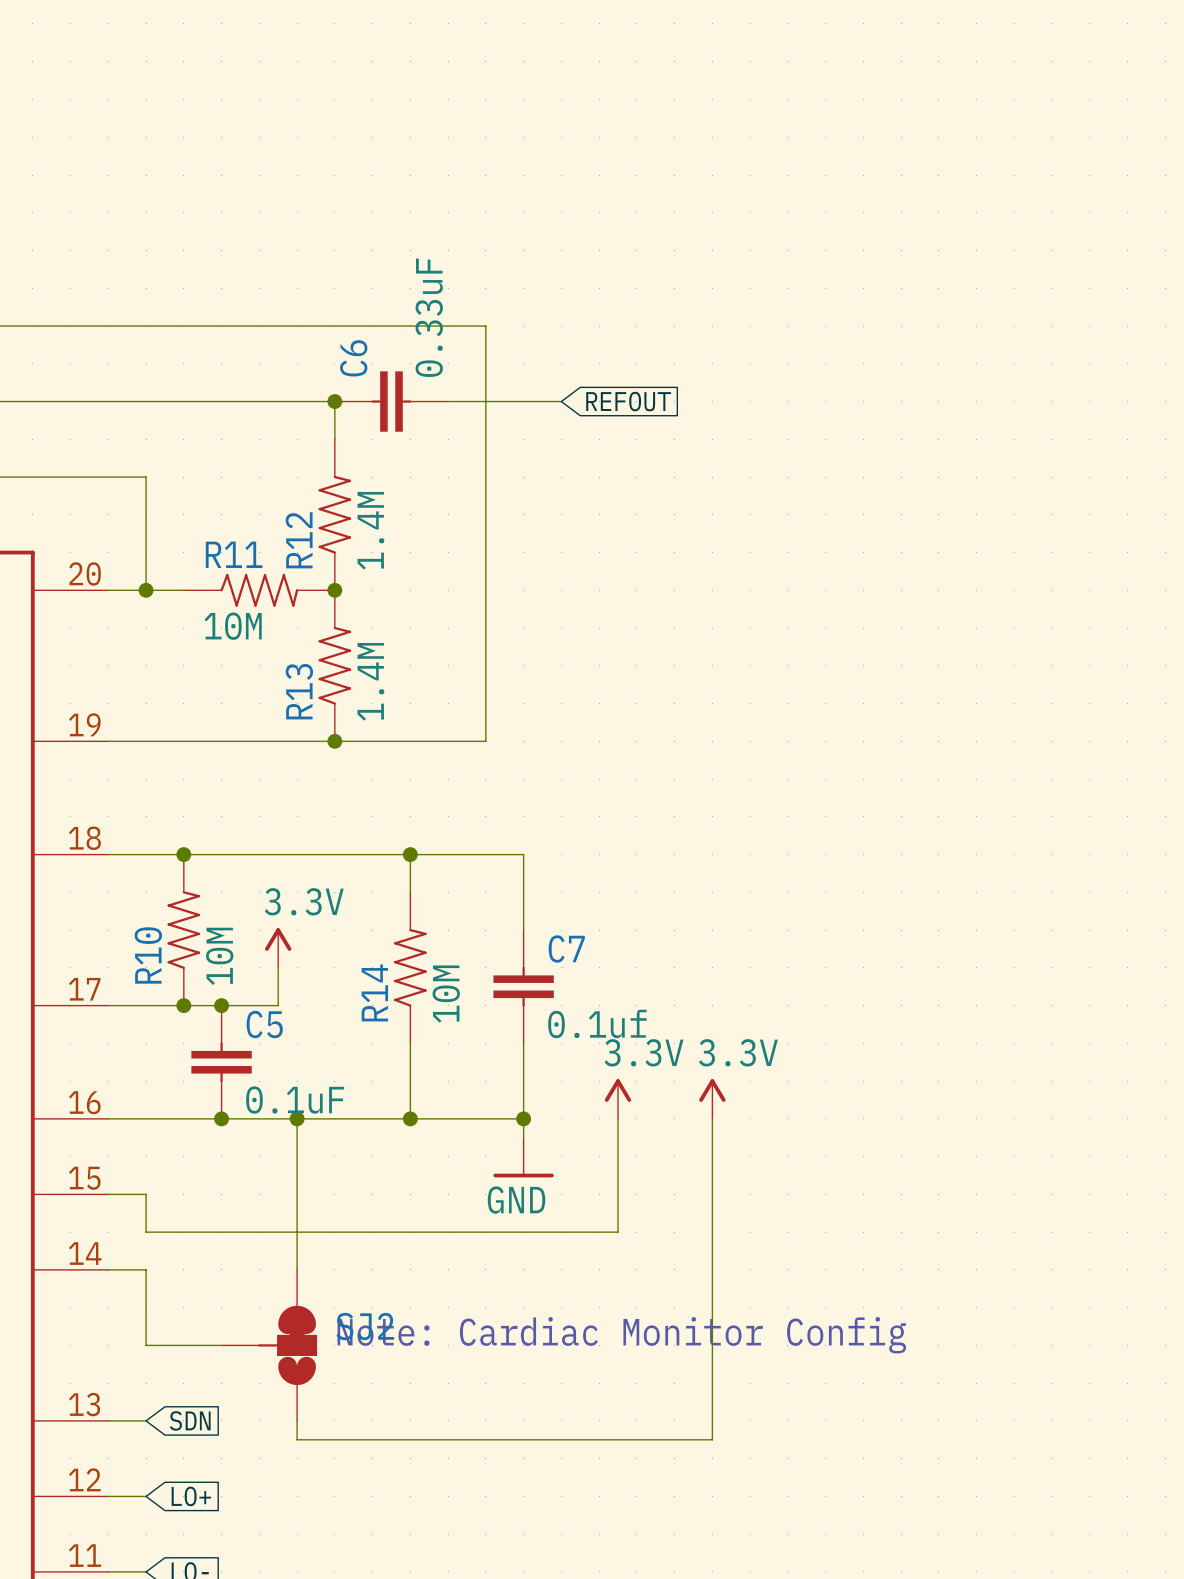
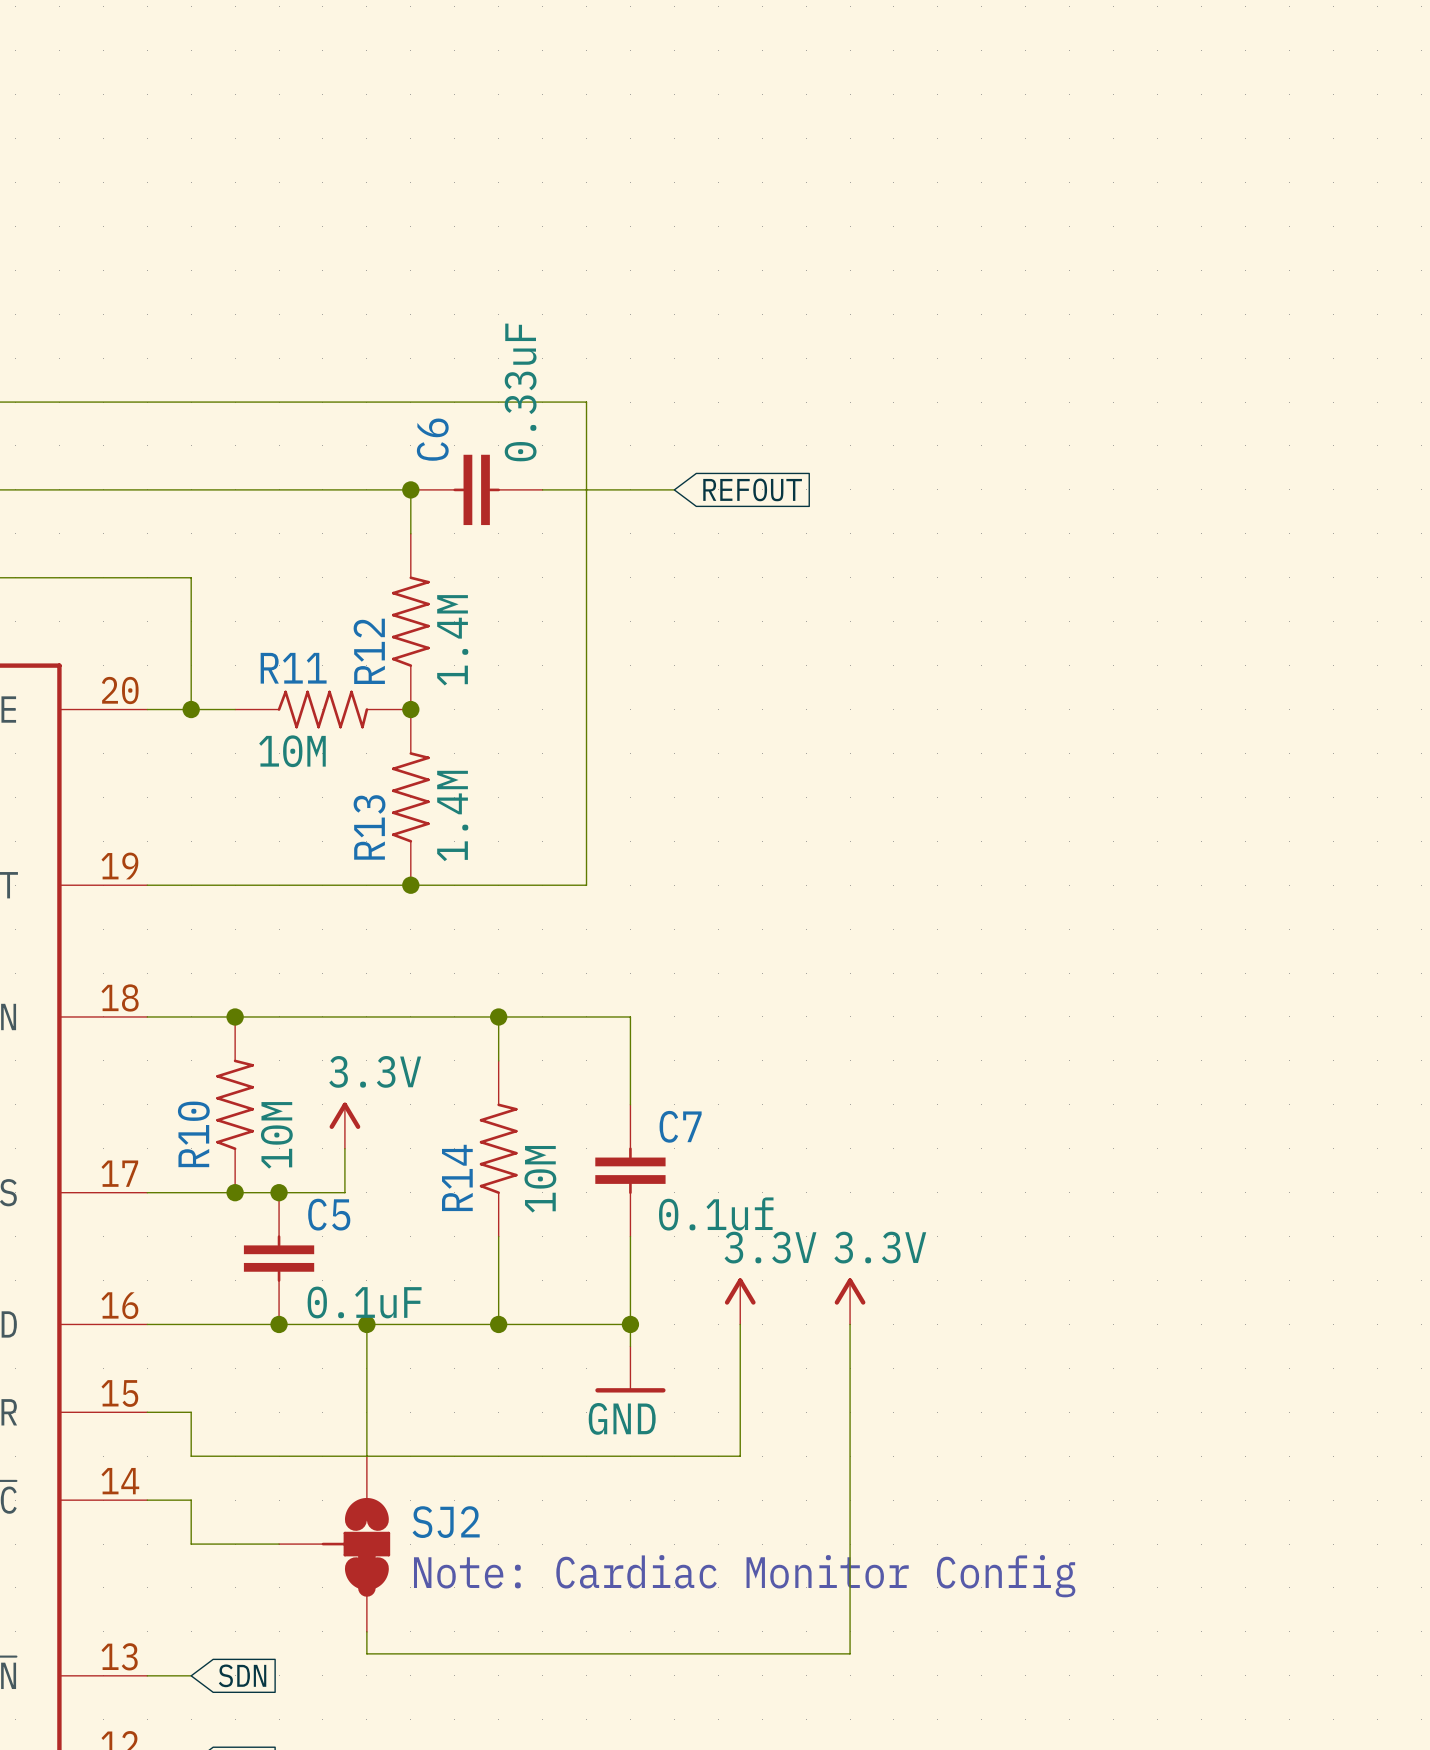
wire: (146, 1307) (146, 1345) (221, 1345) -> (191, 1544) (279, 1544)
SJ2 position: (269, 1345) -> (334, 1544)
wire: (712, 1402) (712, 1439) (297, 1439) (297, 1420) -> (850, 1653) (366, 1653) (366, 1631)

